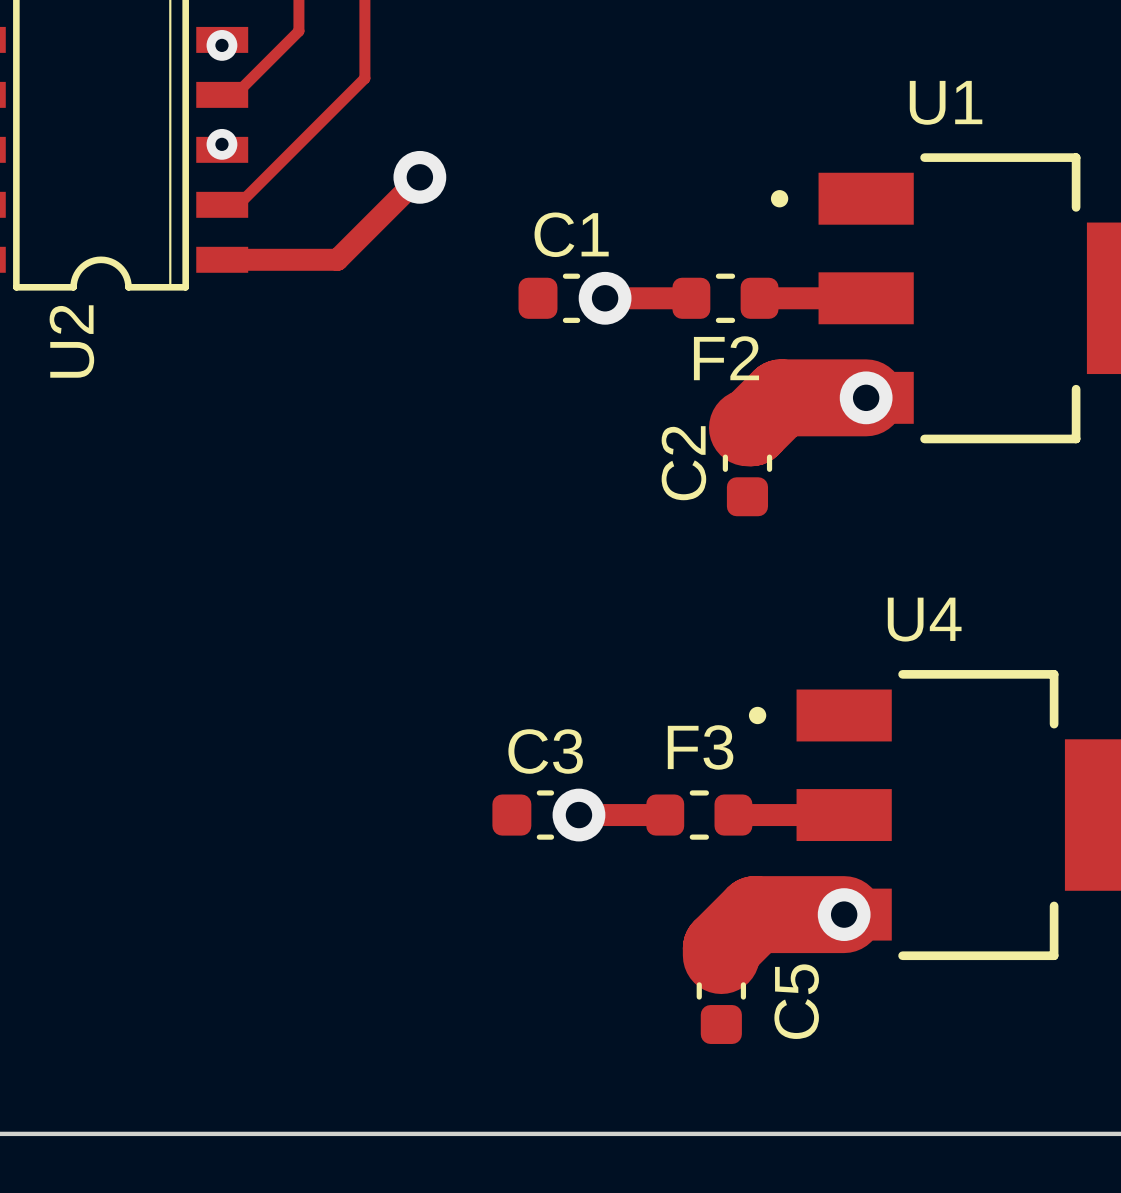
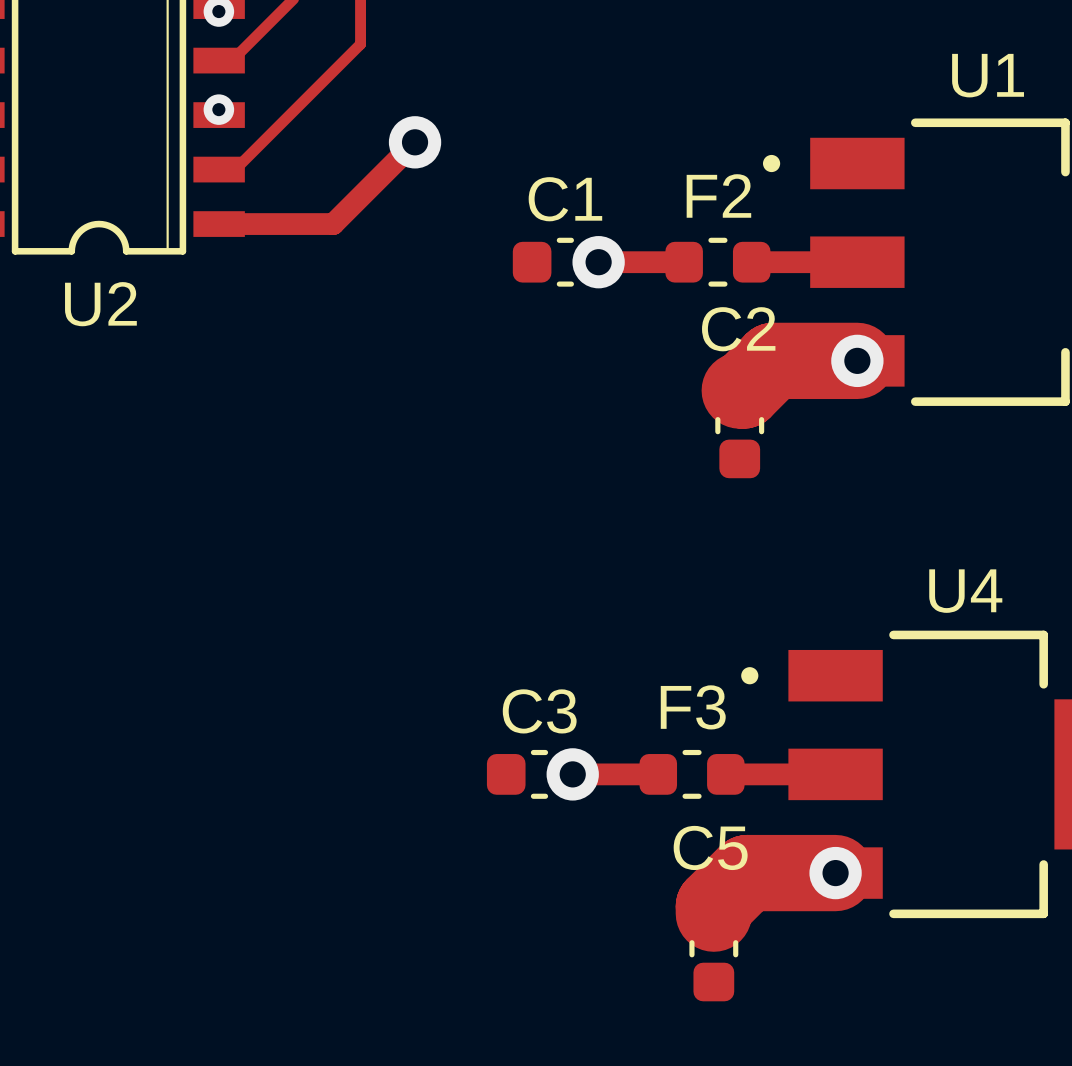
U1 name position: U1 (946, 102) -> U1 (988, 75)
U2 name rotation: 0° (71, 341) -> 90° clockwise (100, 304)
F2 name position: F2 (726, 358) -> F2 (718, 195)
C2 name rotation: 0° (683, 463) -> 90° clockwise (738, 329)
C2 name position: C2 (683, 463) -> C2 (738, 329)
U4 name position: U4 (924, 619) -> U4 (965, 591)
C5 name rotation: 0° (796, 1001) -> 90° clockwise (710, 847)
C5 name position: C5 (796, 1001) -> C5 (710, 847)

